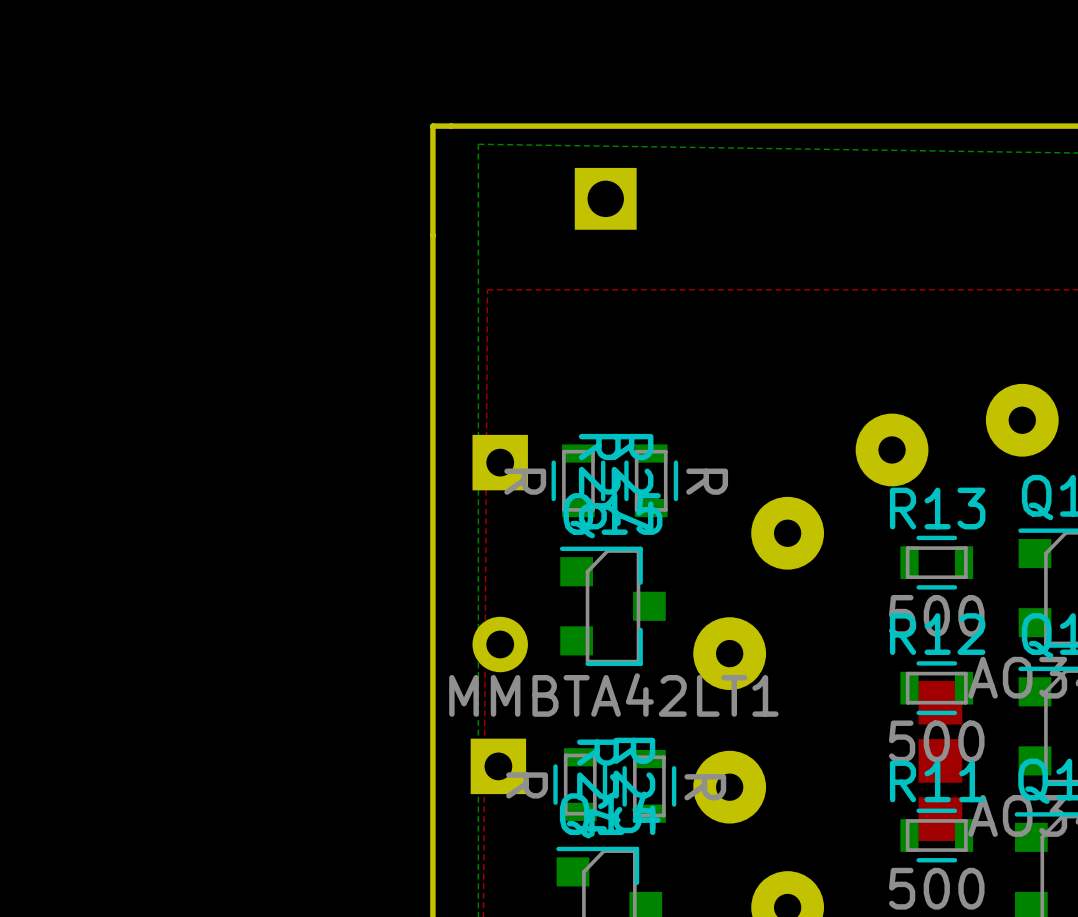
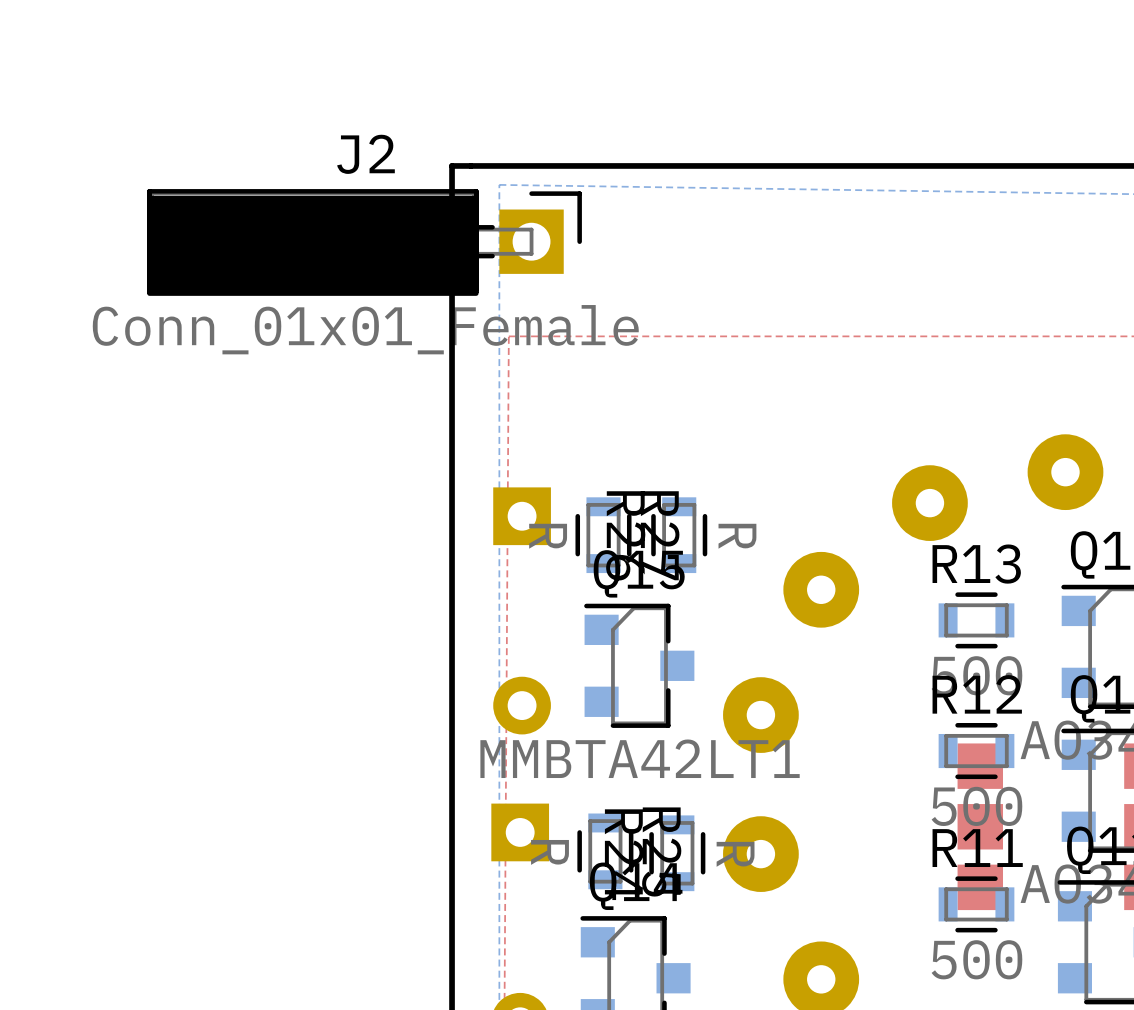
J2 side: top (605, 198) -> bottom (364, 242)

